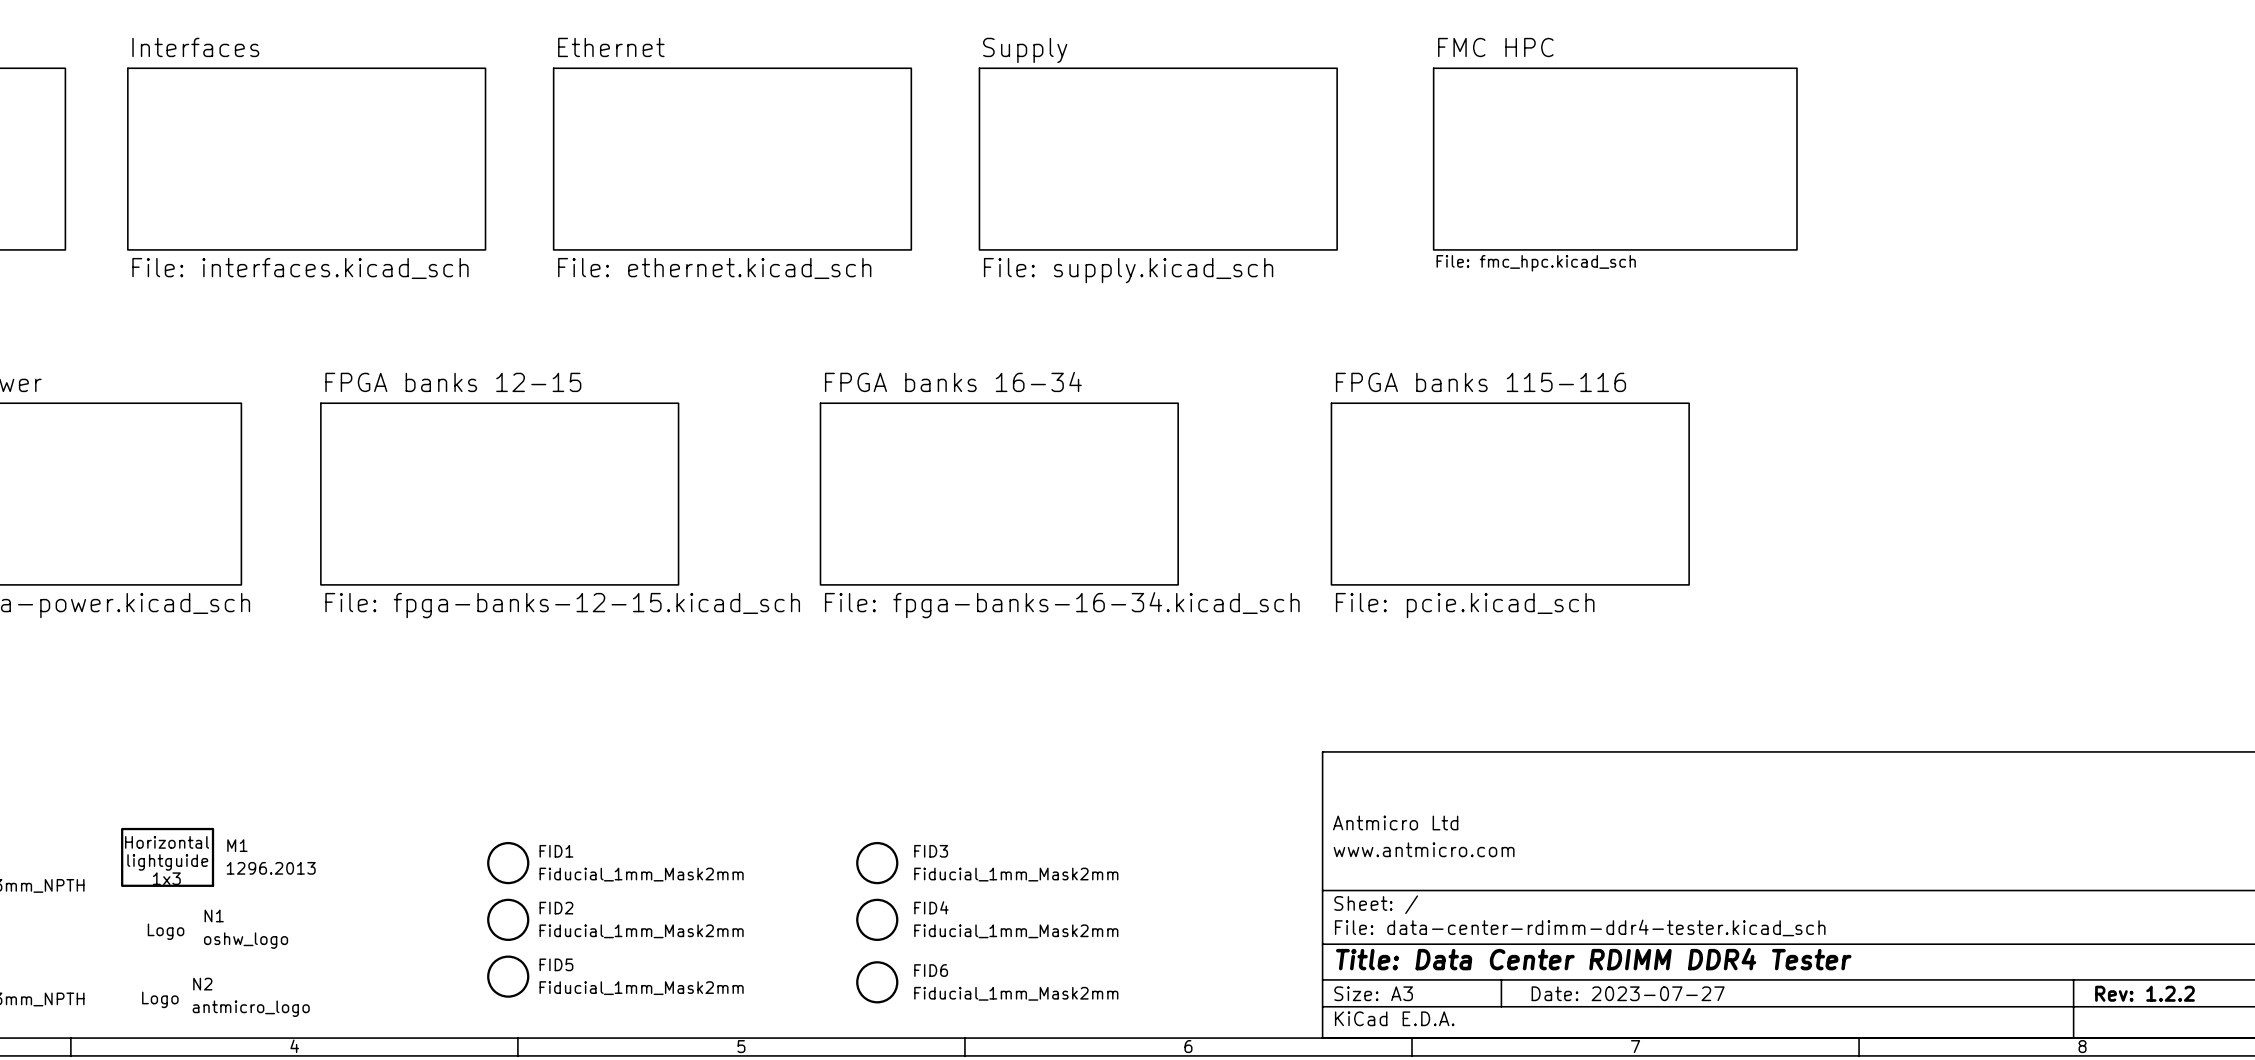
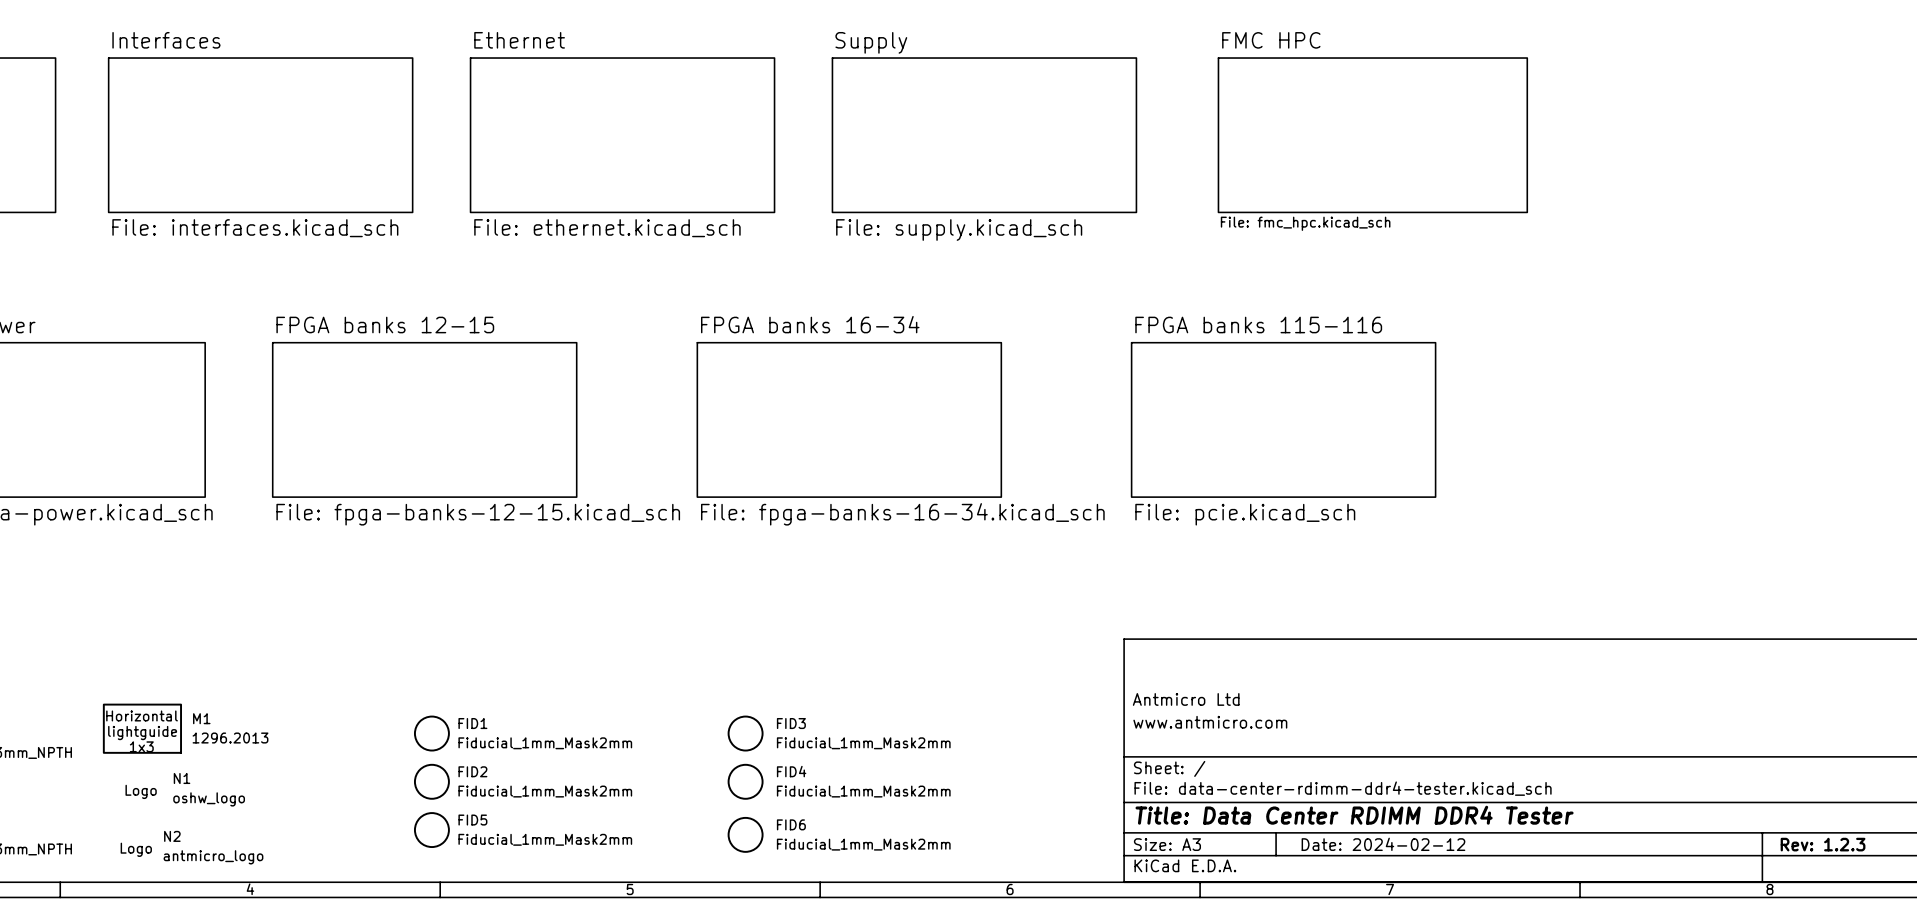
title block: Date: 2023-07-27 (1628, 993) -> Date: 2024-02-12 (1383, 844)
title block: Rev: 1.2.2 (2144, 993) -> Rev: 1.2.3 (1823, 844)

